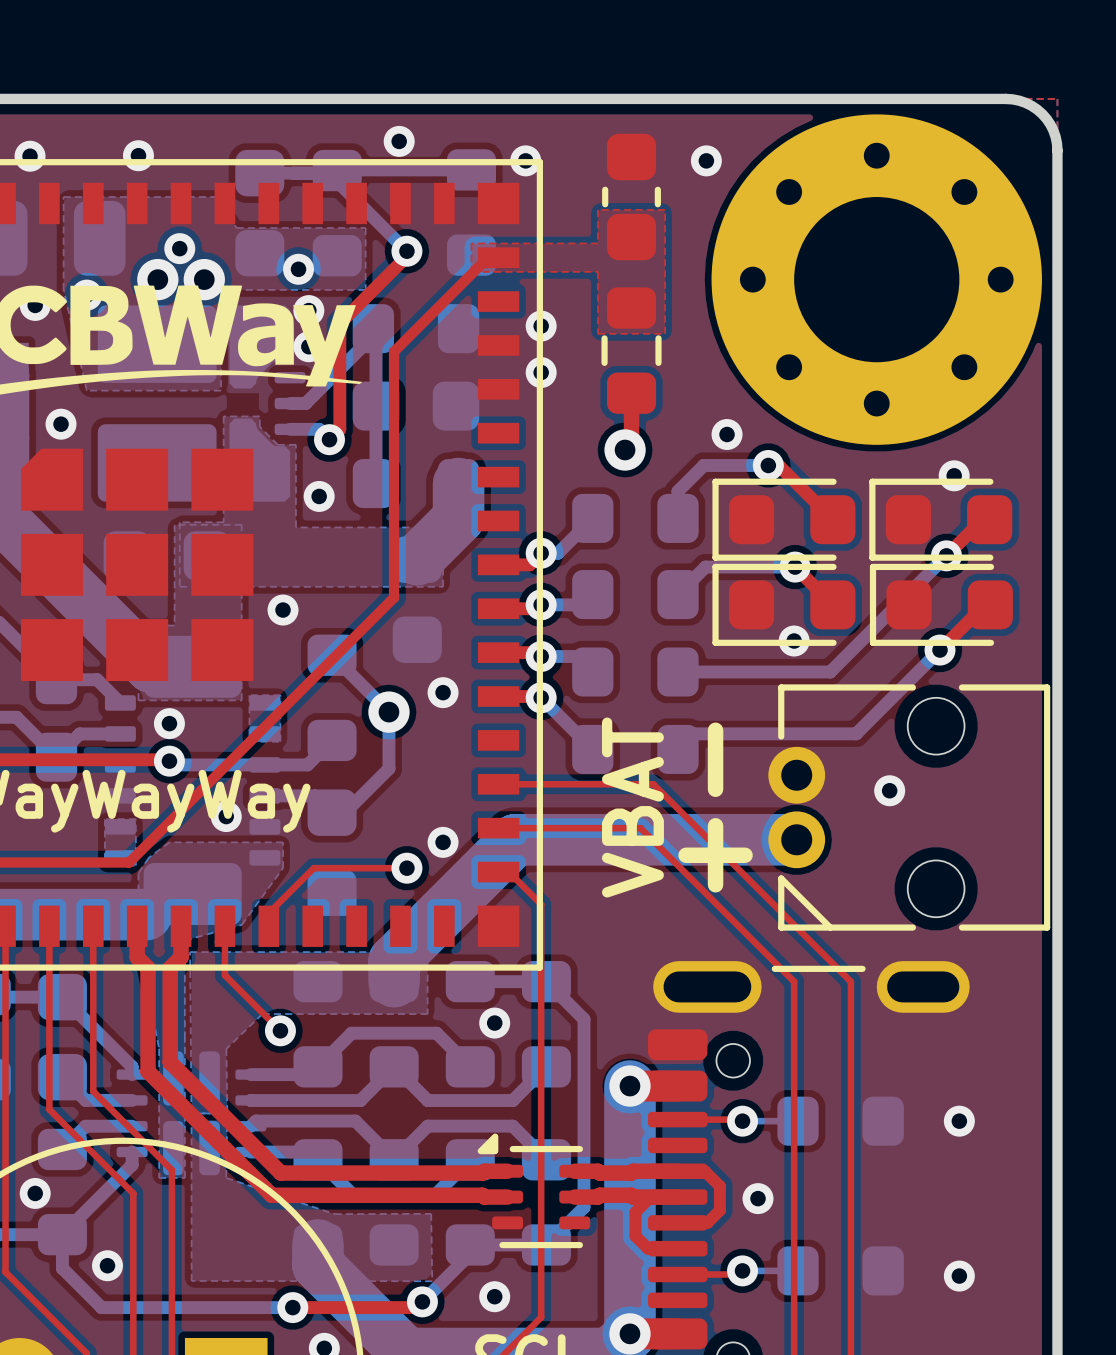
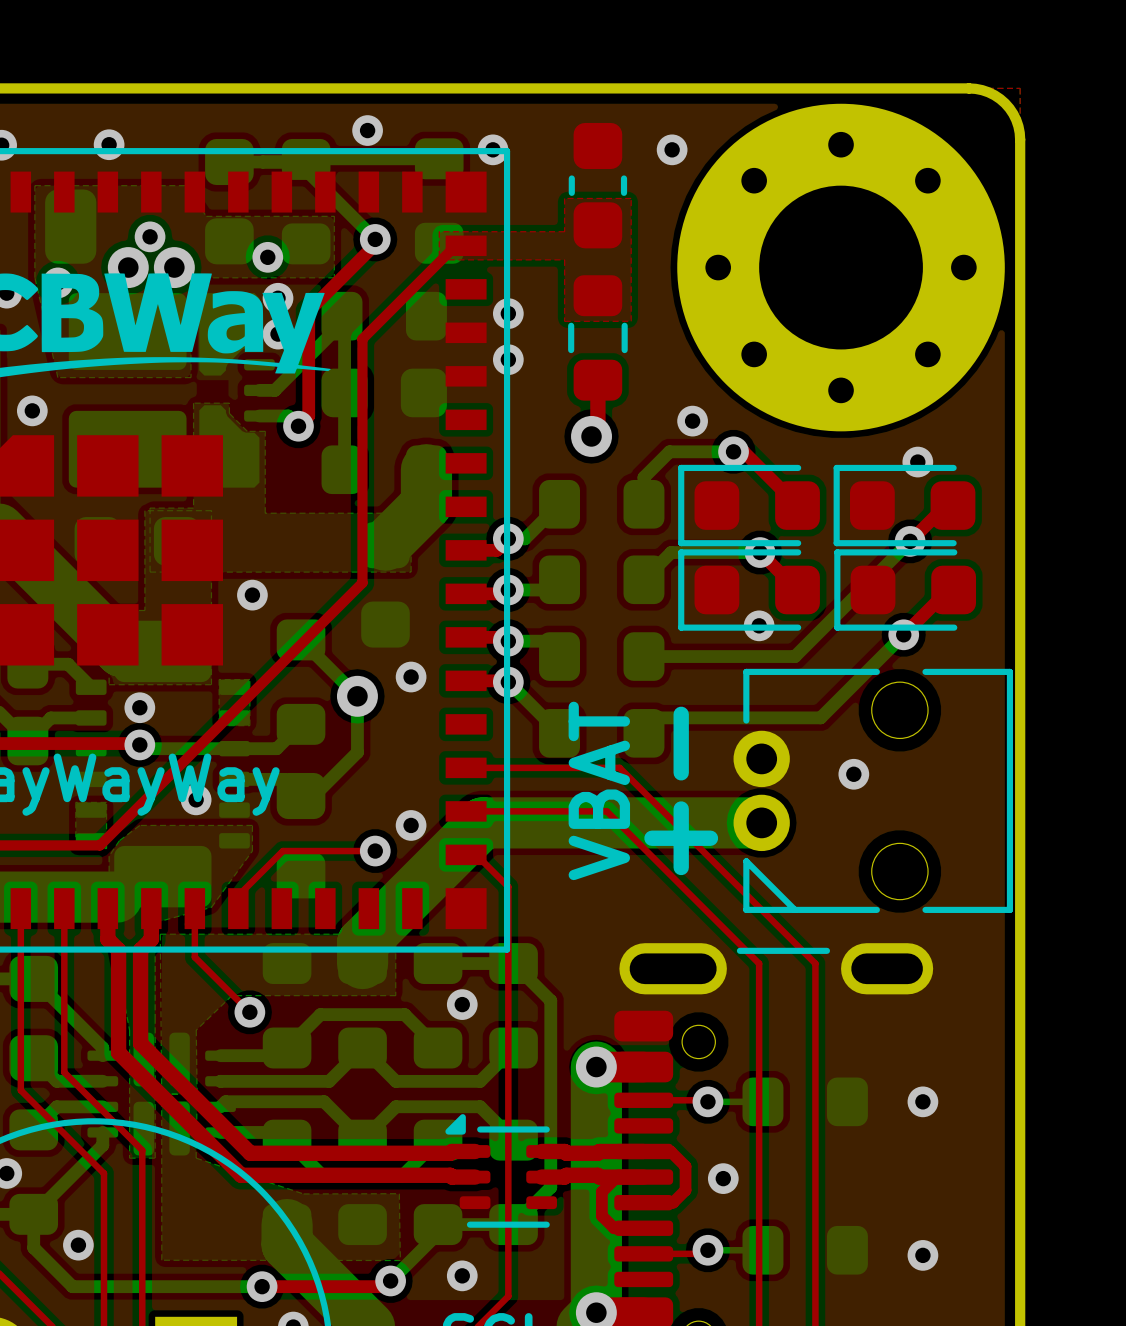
via: (319, 496) -> none

